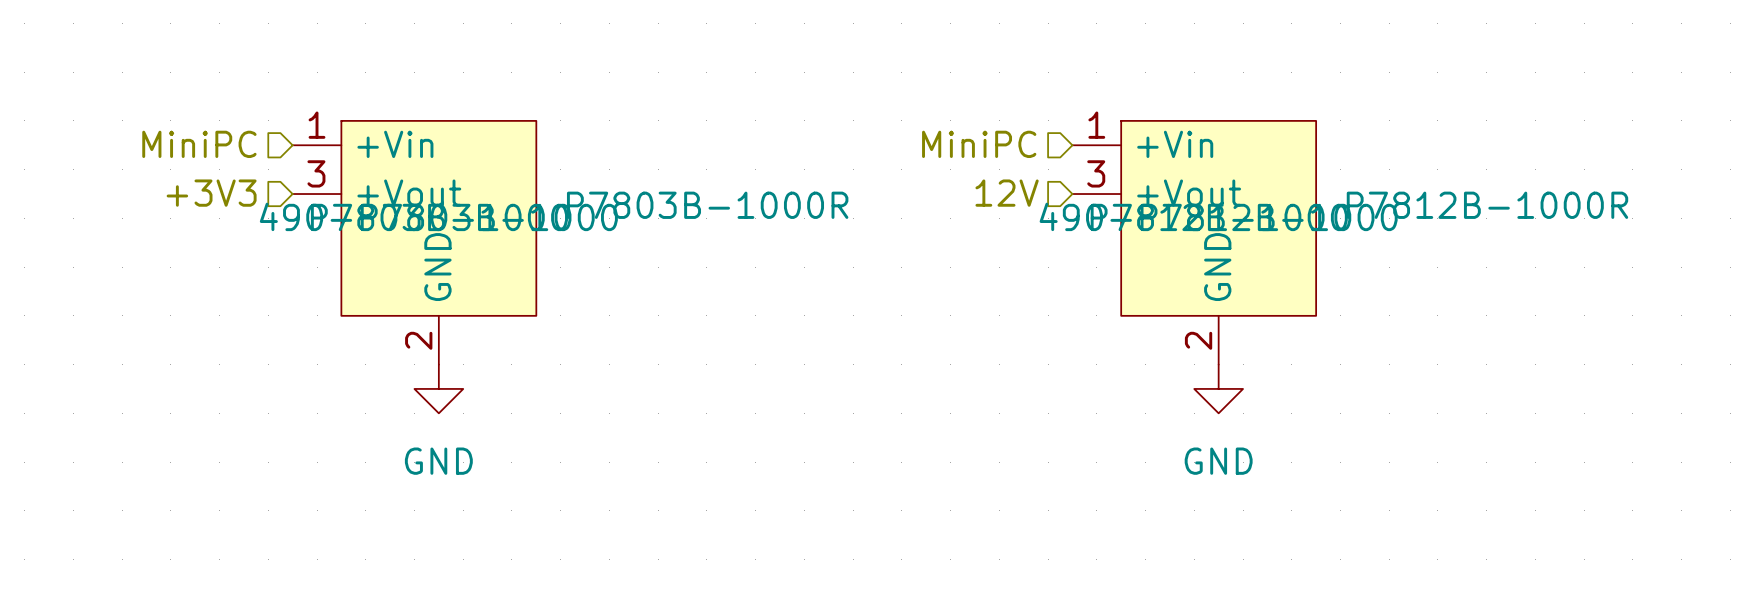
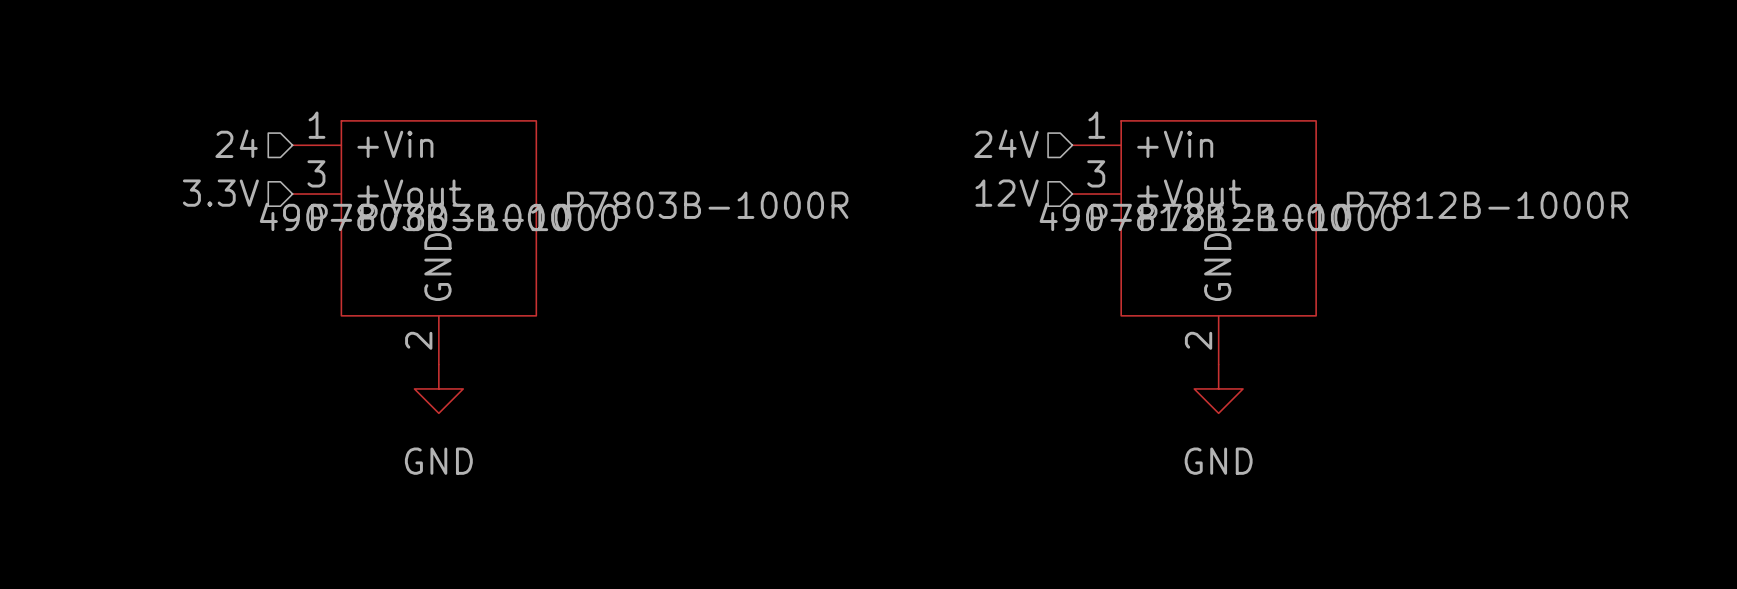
hierarchical label: MiniPC (199, 144) -> 24 (236, 143)
hierarchical label: MiniPC (979, 144) -> 24V (1006, 143)
hierarchical label: +3V3 (211, 193) -> 3.3V (220, 193)

